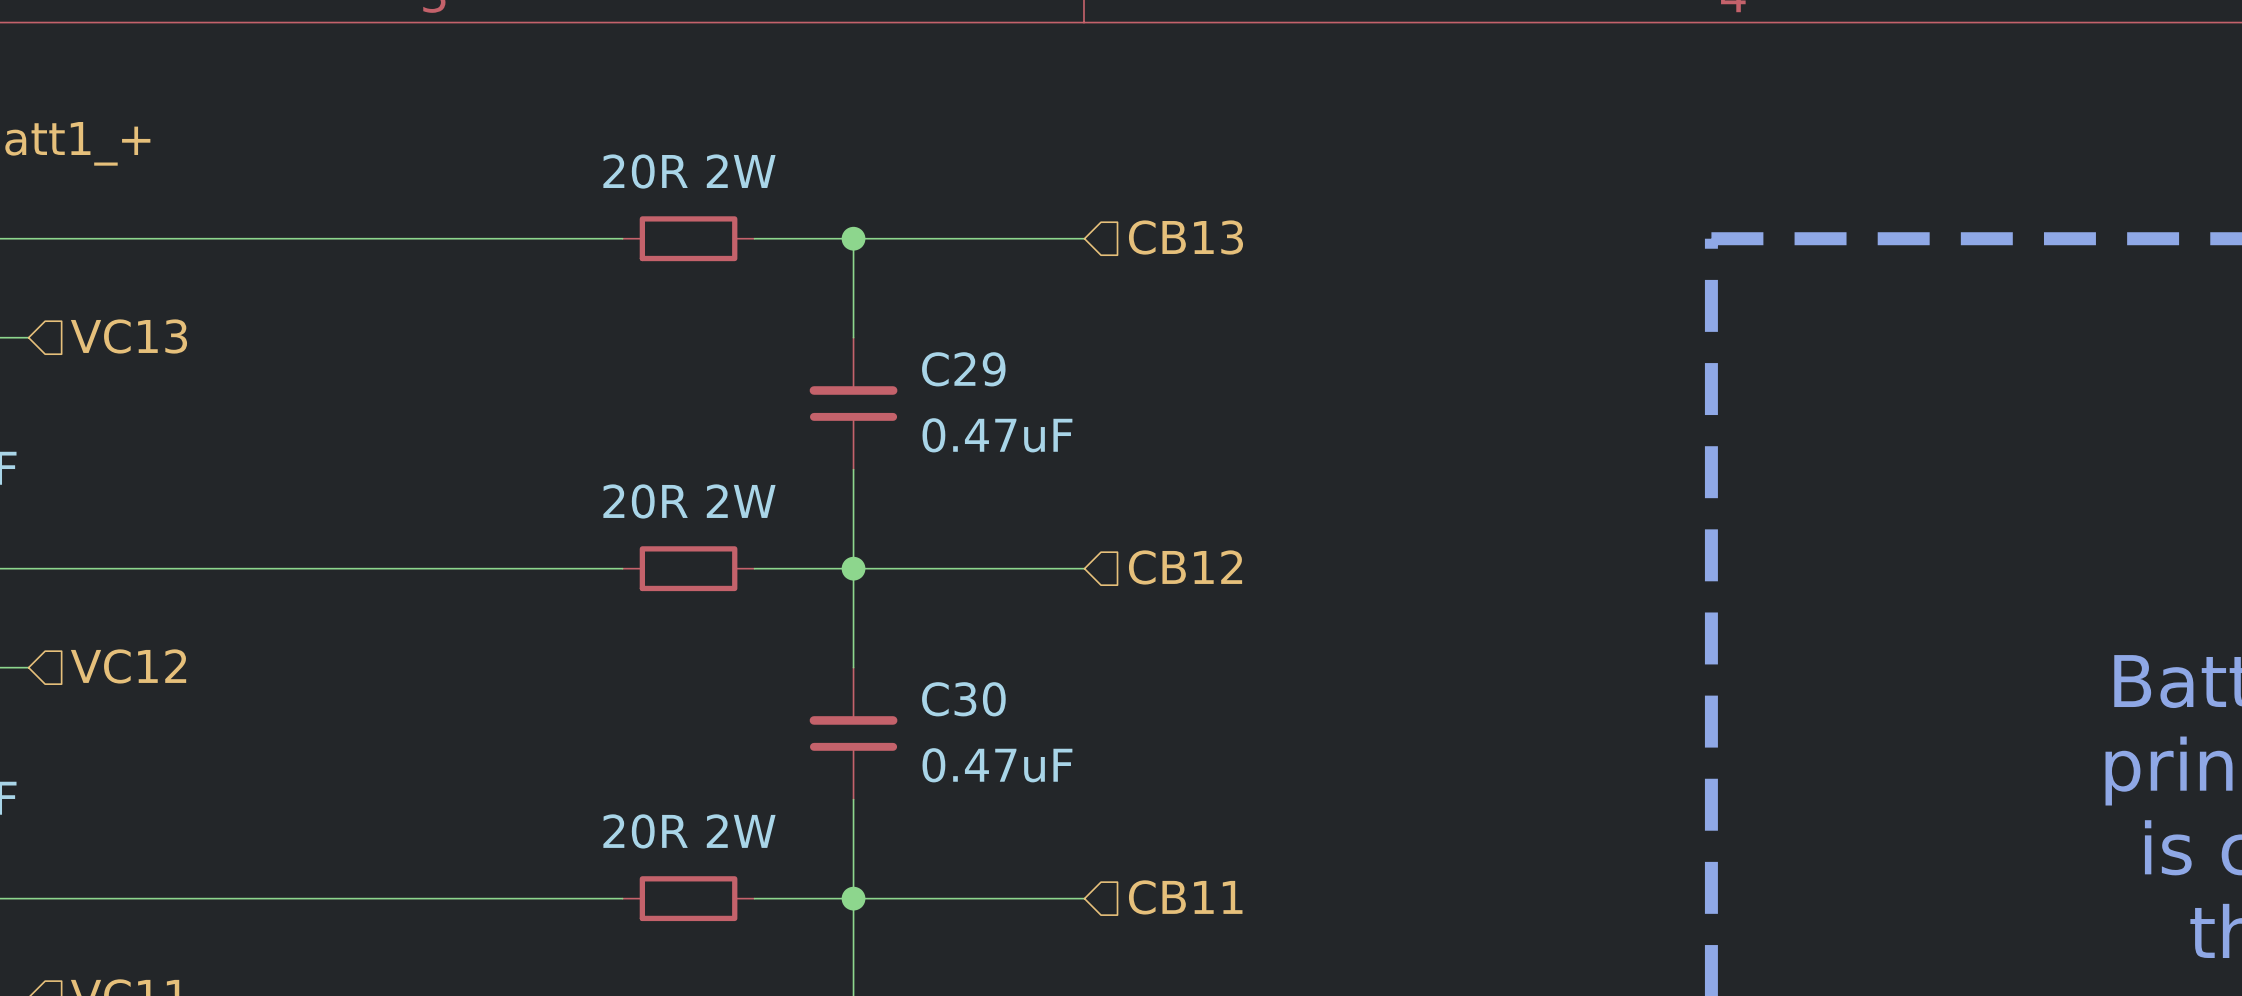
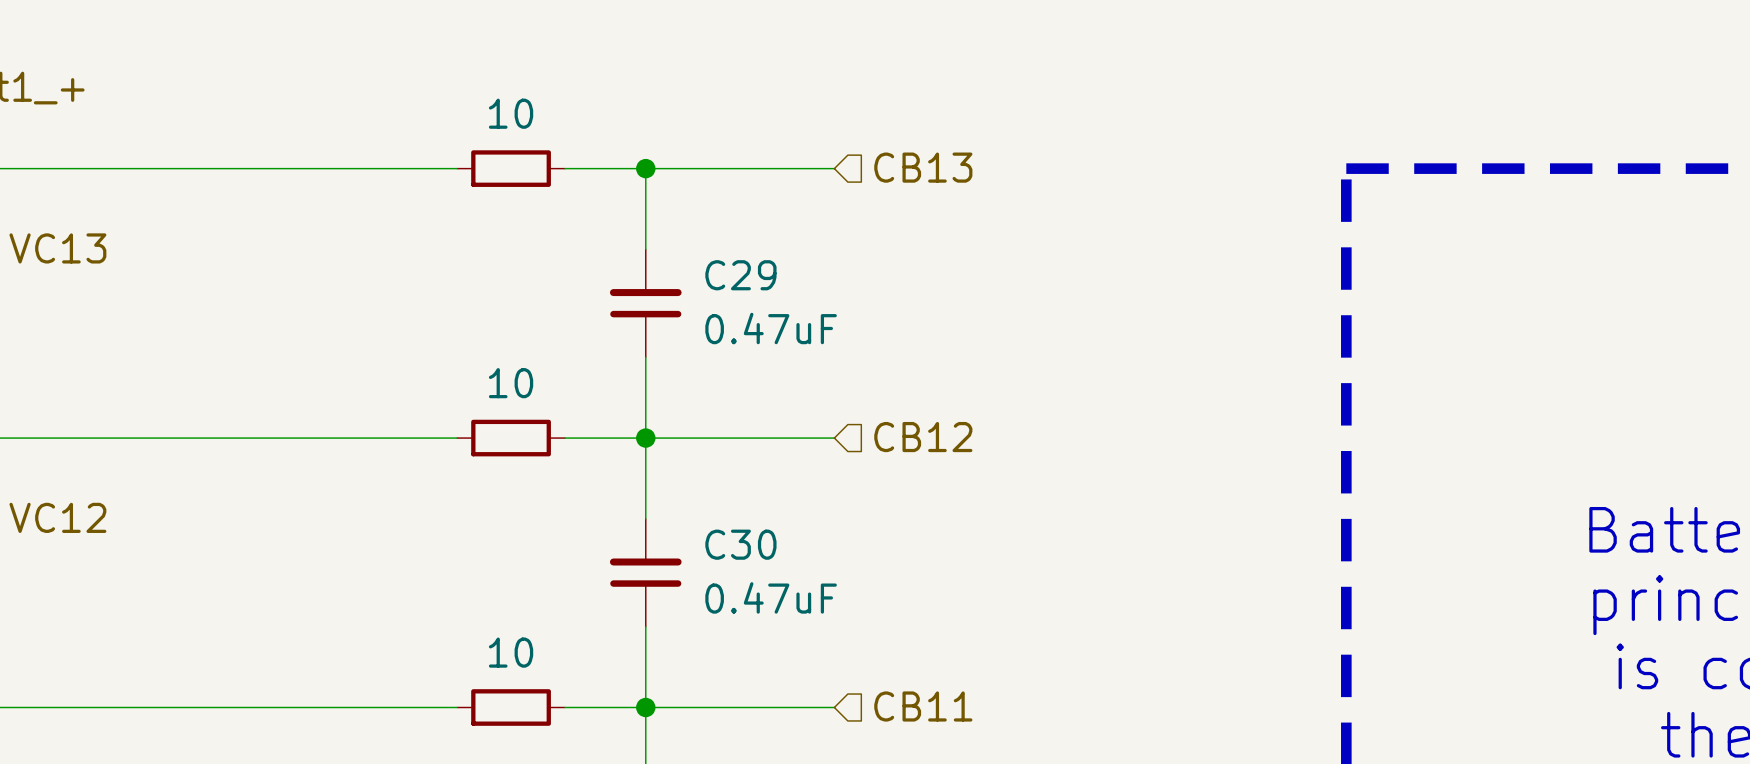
part value: 20R 2W (689, 171) -> 10 (511, 113)
part value: 20R 2W (689, 501) -> 10 (511, 383)
part value: 20R 2W (689, 831) -> 10 (511, 652)

